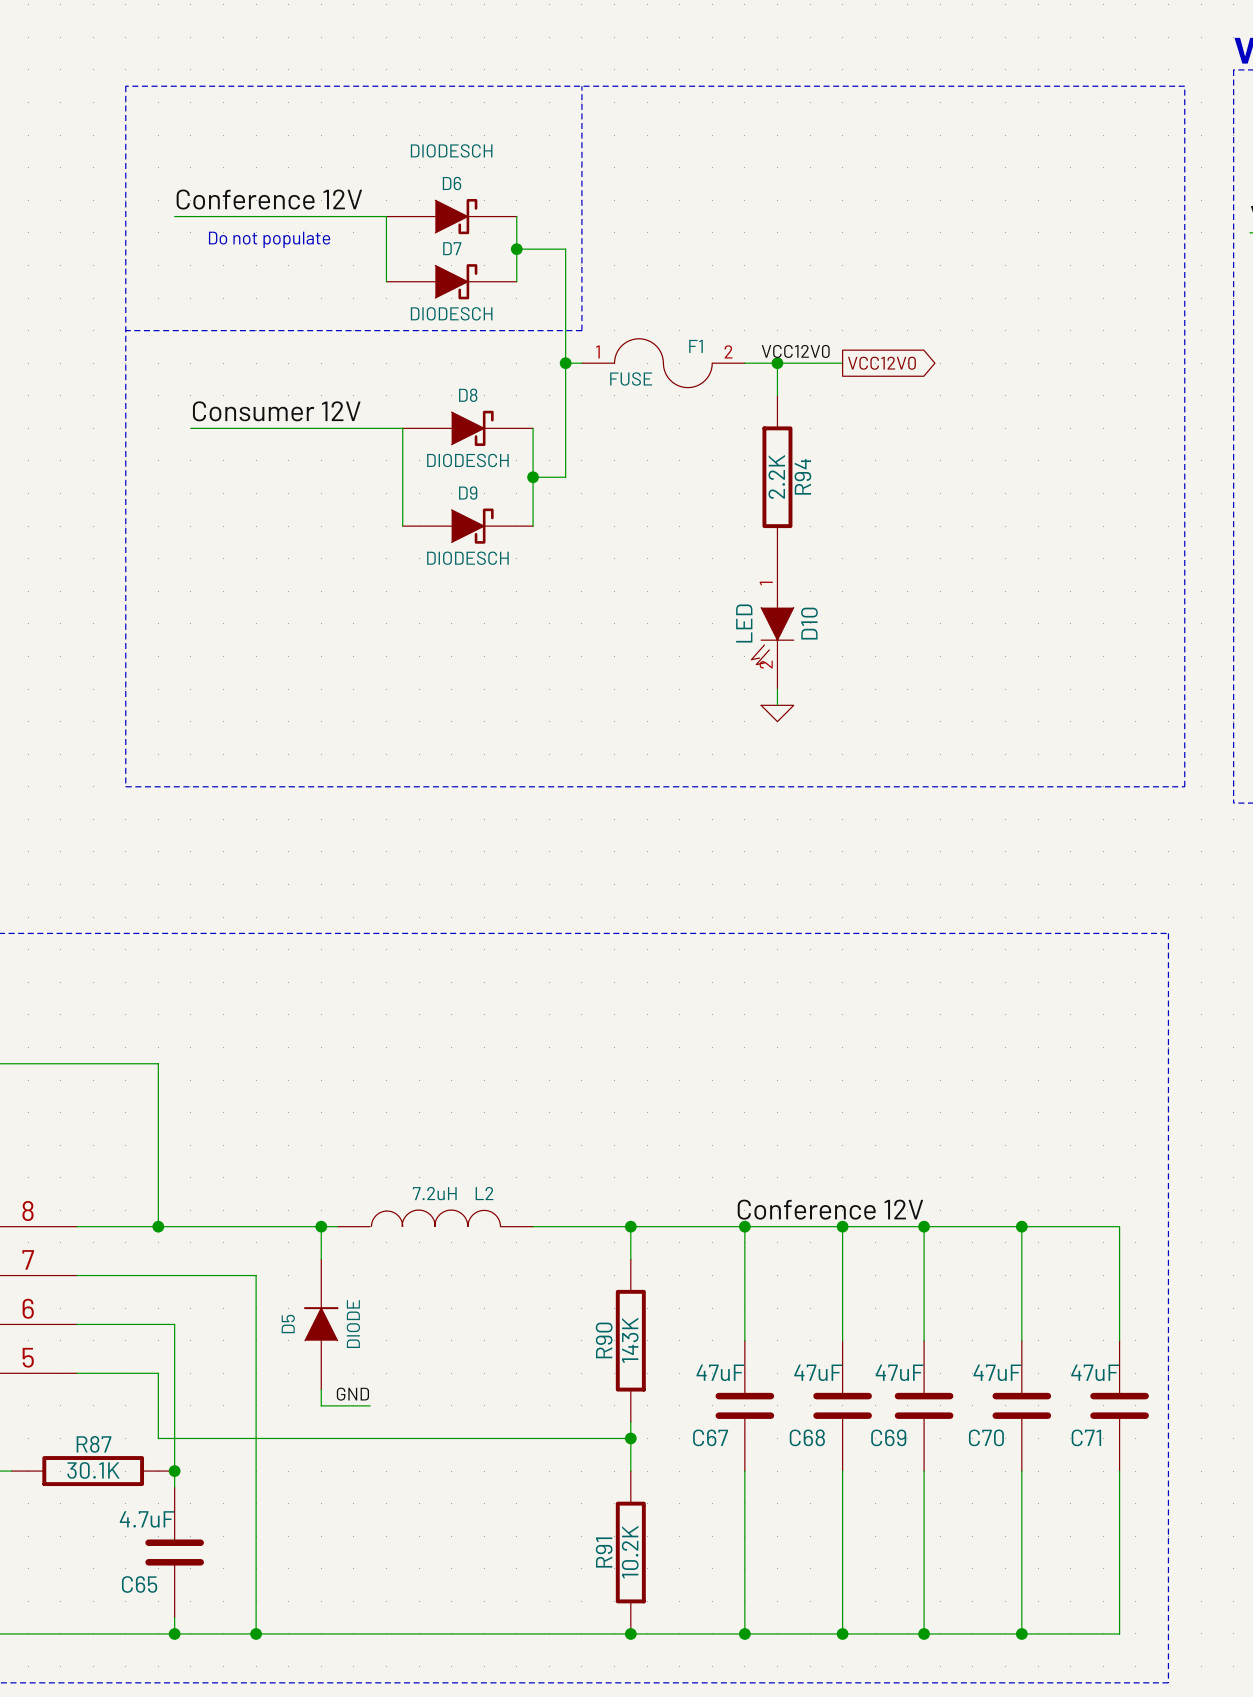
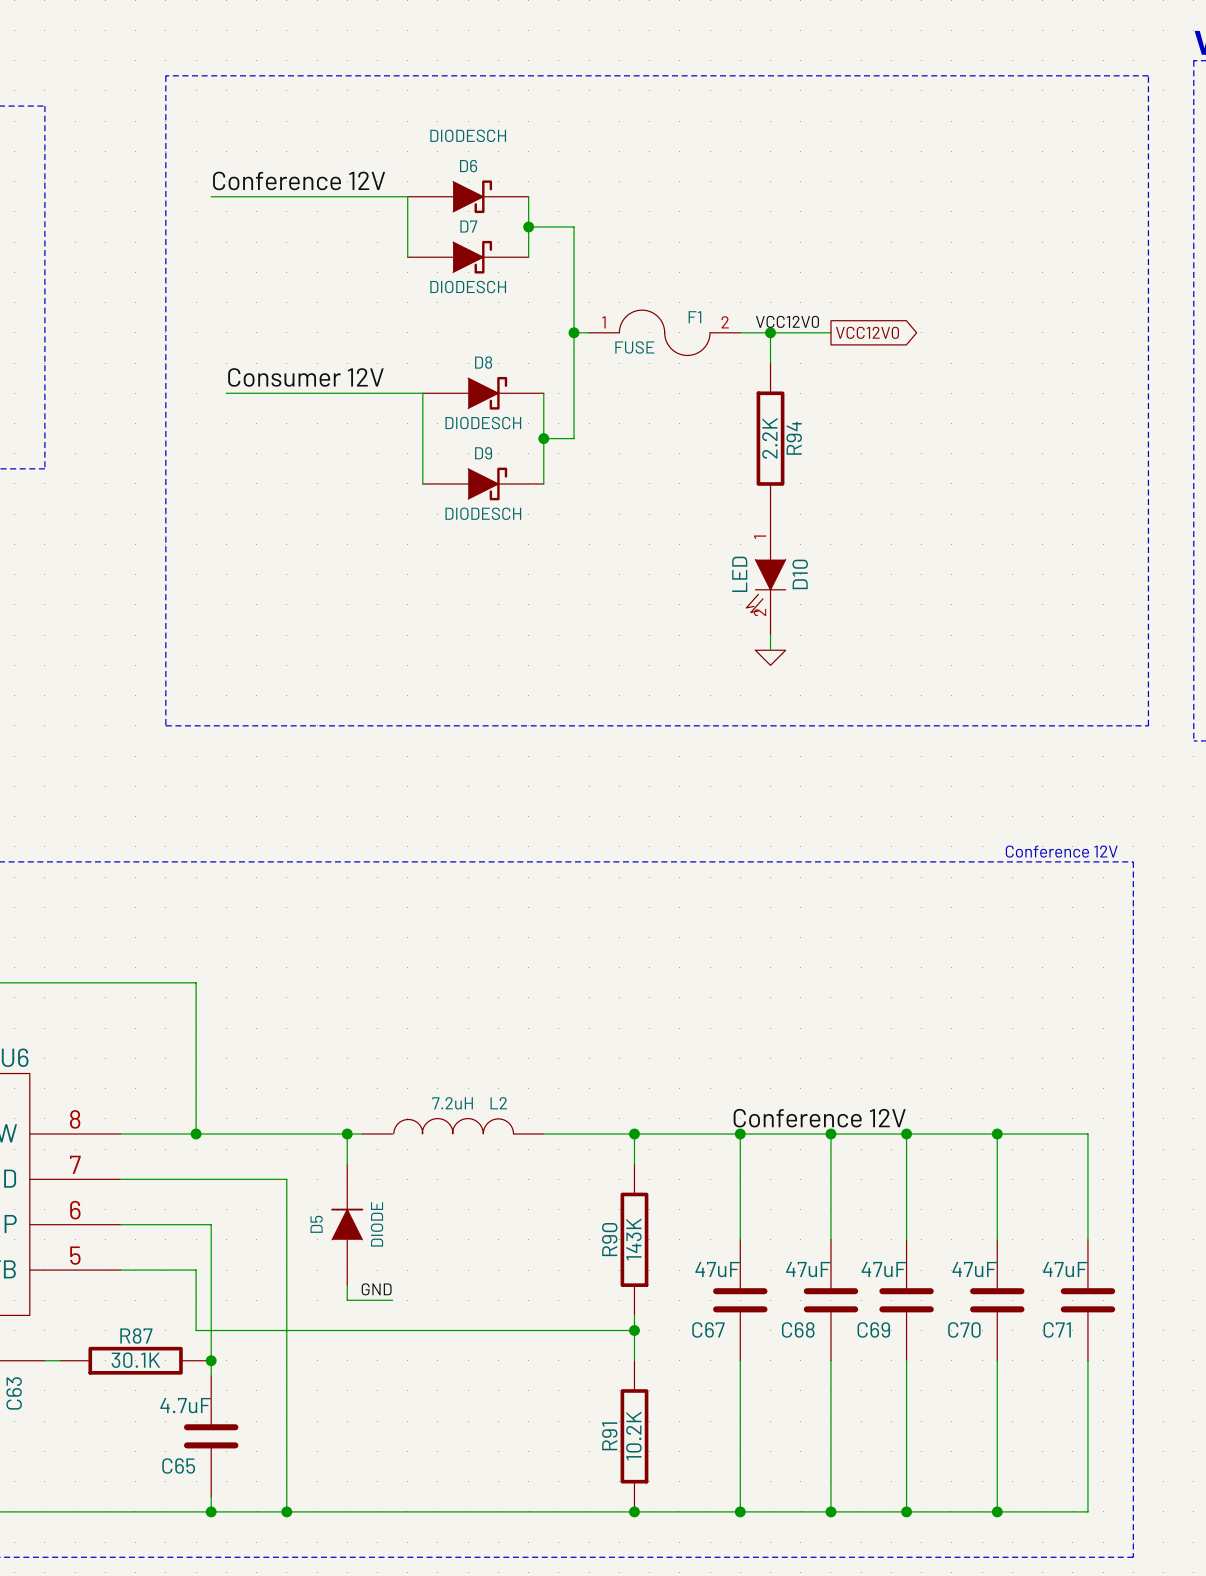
line: (581, 86) (581, 330) (125, 330) -> none
text: Do not populate (269, 239) -> none
text: none -> Conference 12V (1061, 851)

